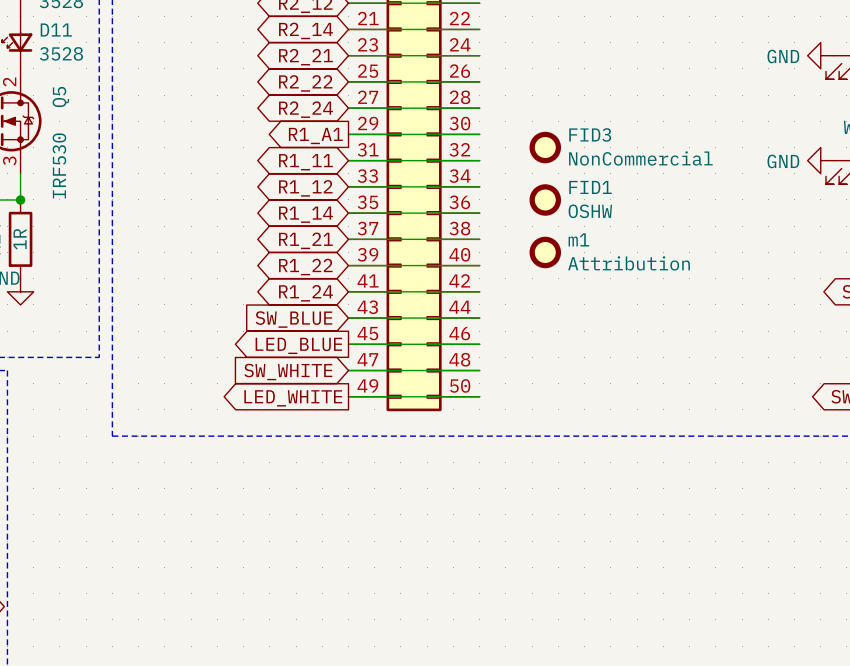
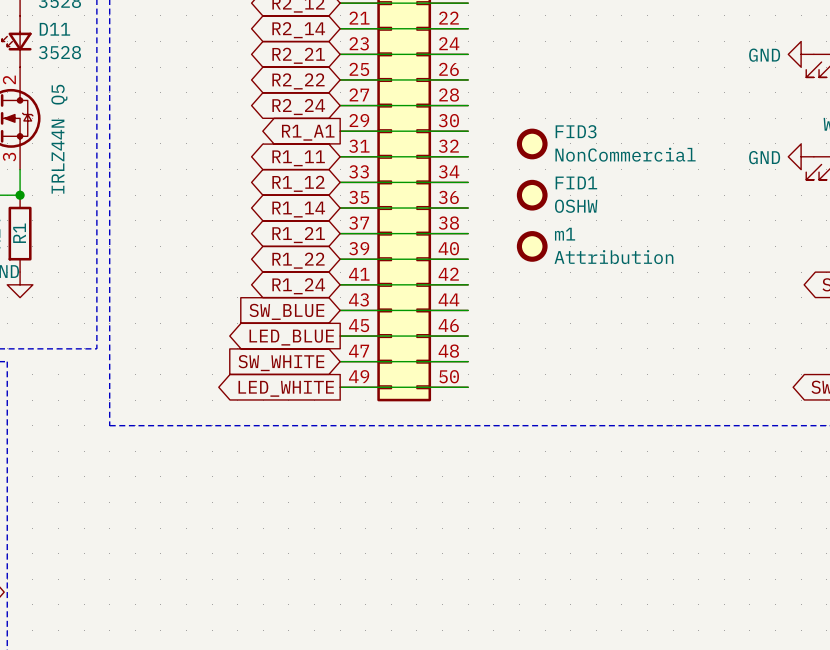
Q5 value: IRF530 (59, 165) -> IRLZ44N (57, 156)
part value: 1R (20, 239) -> R1 (19, 233)

